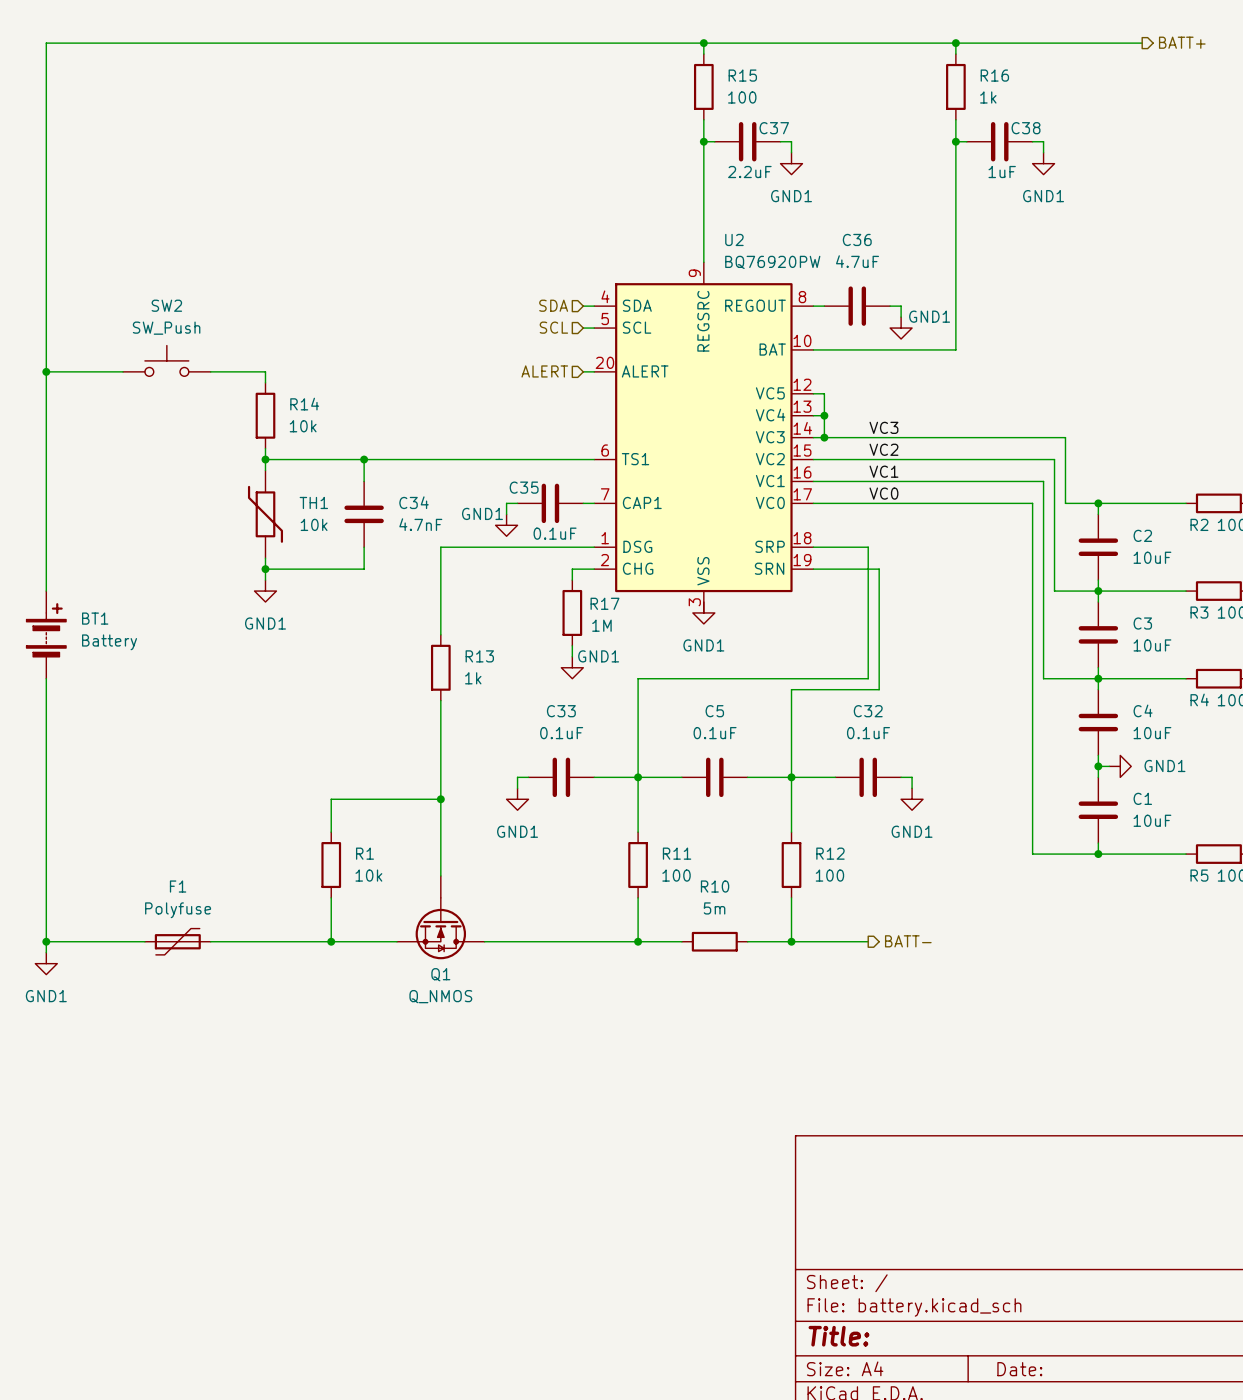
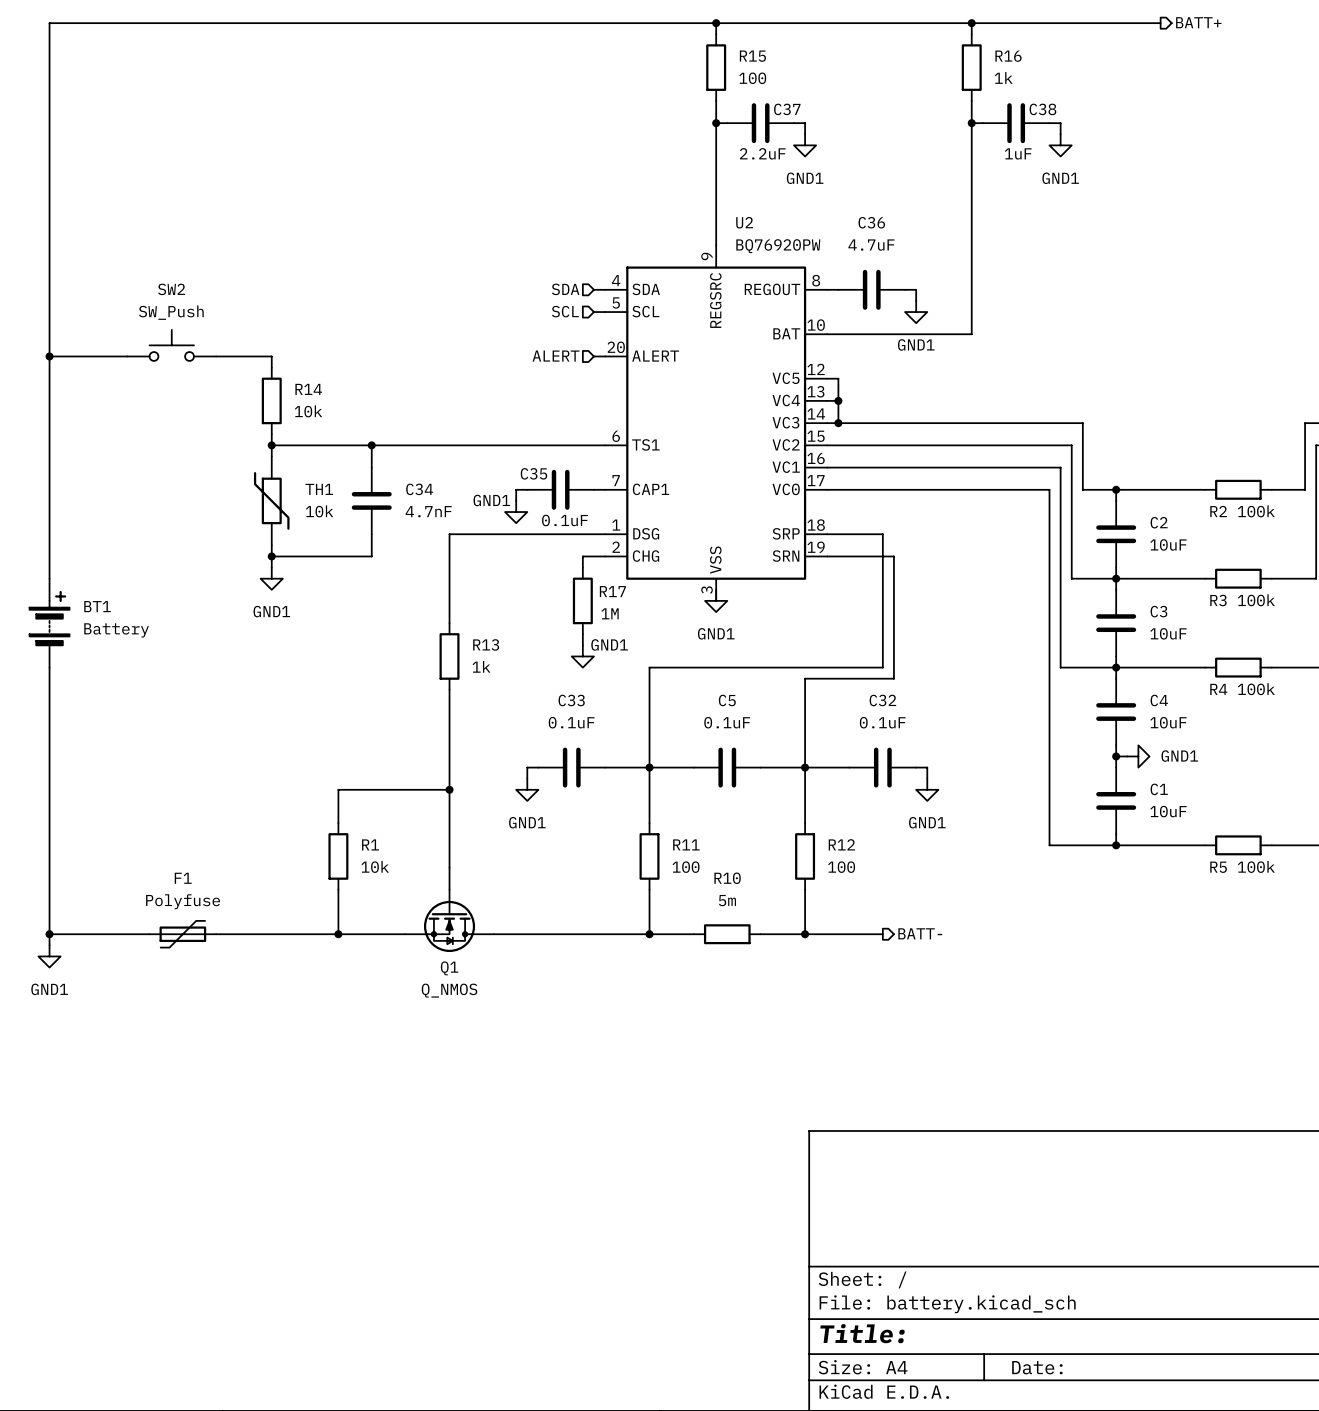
power symbol text position: GND1 (929, 316) -> GND1 (916, 344)
label: VC3 (883, 427) -> none
label: VC2 (883, 449) -> none
label: VC1 (883, 471) -> none
label: VC0 (883, 493) -> none

